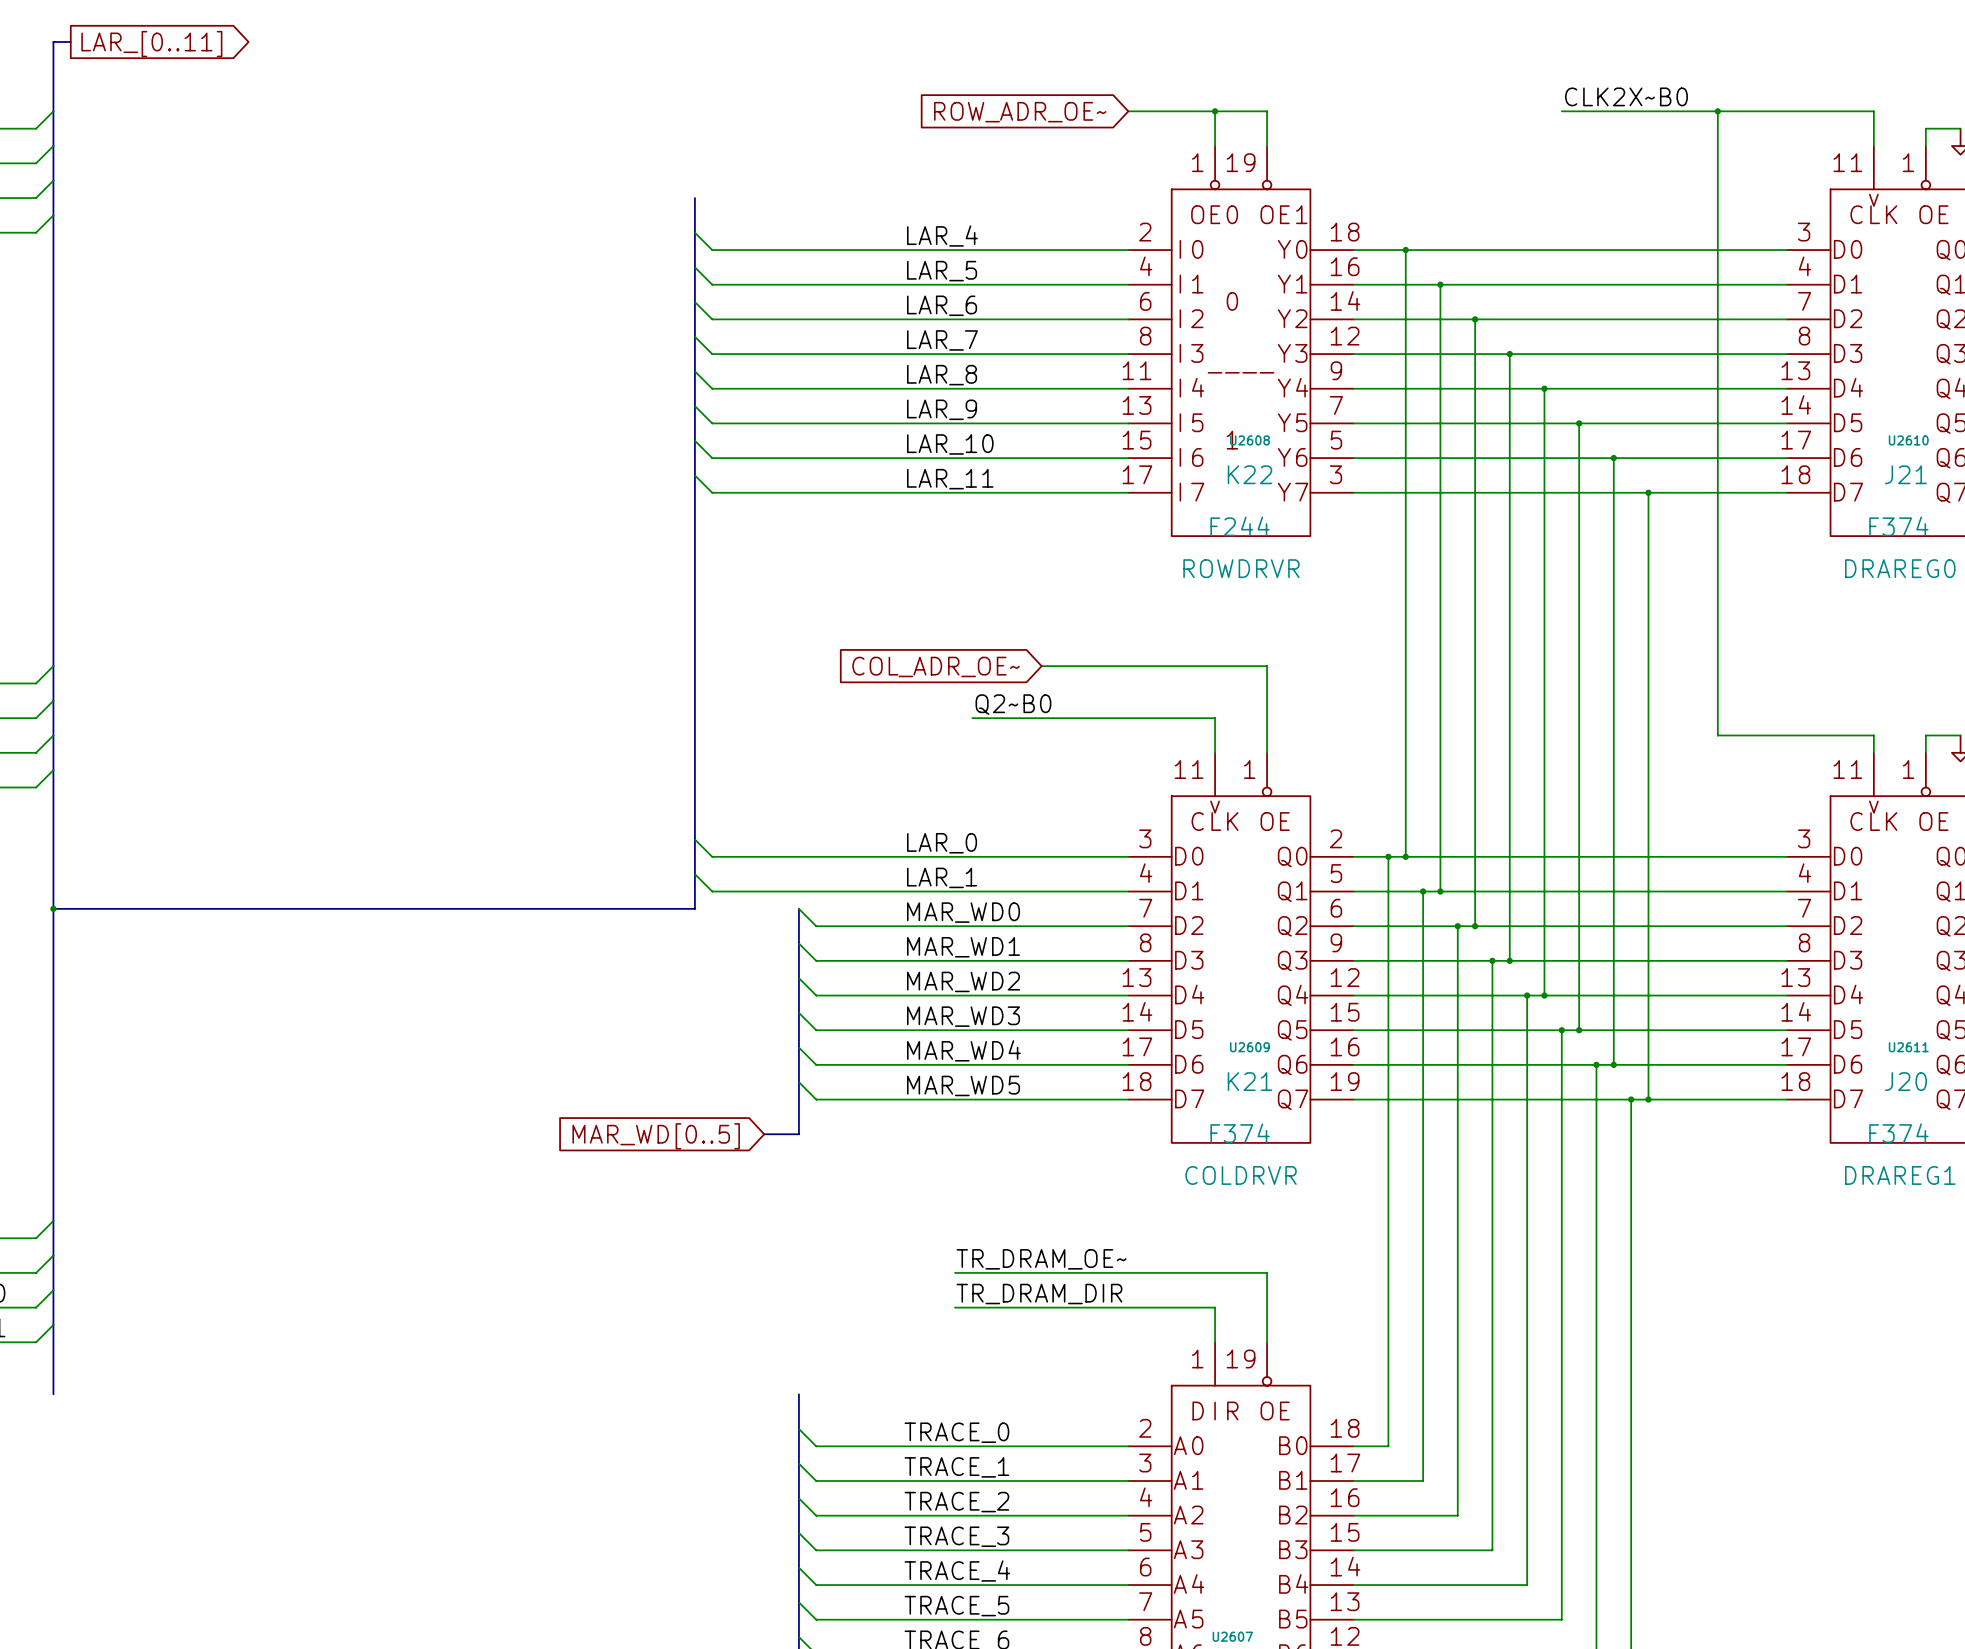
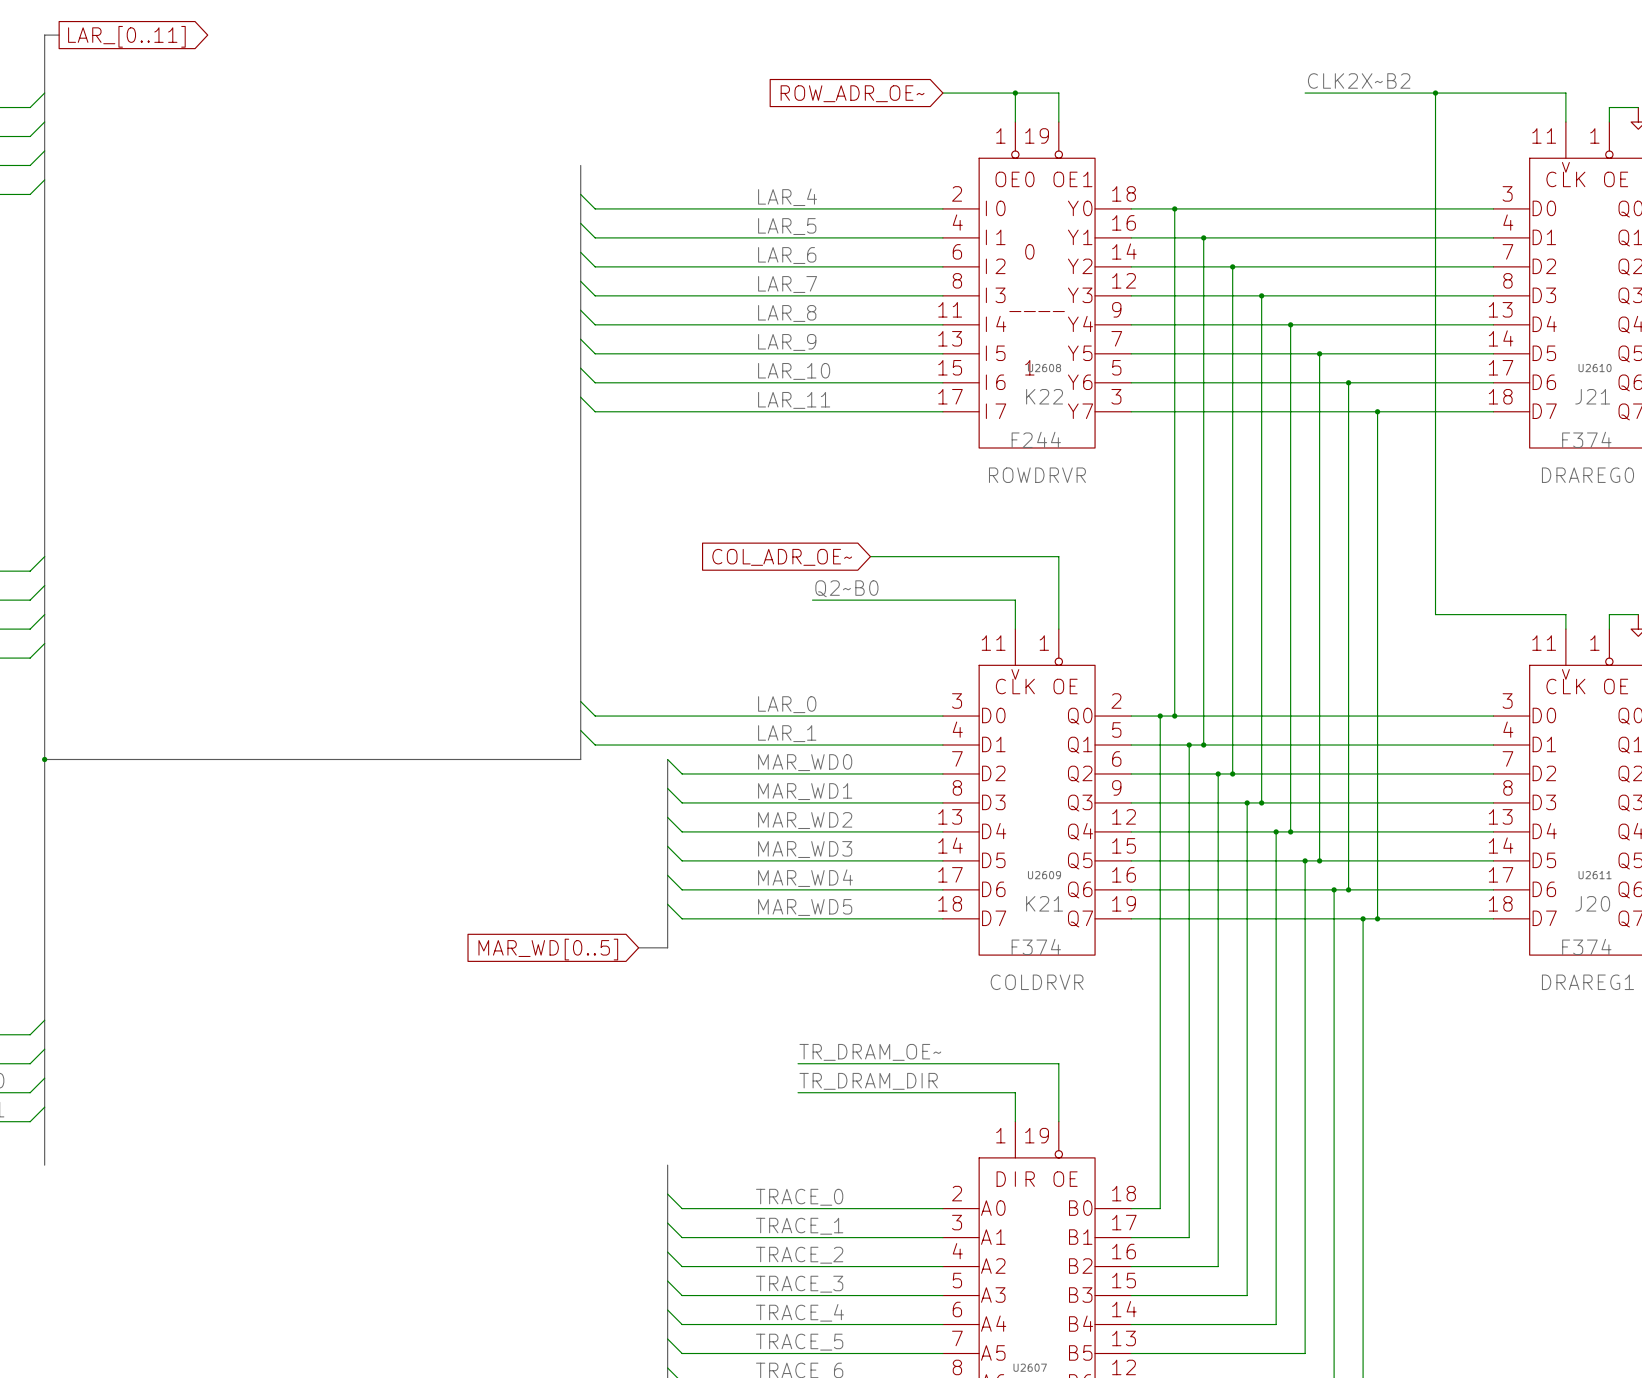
label: CLK2X~B0 (1626, 96) -> CLK2X~B2 (1359, 80)

